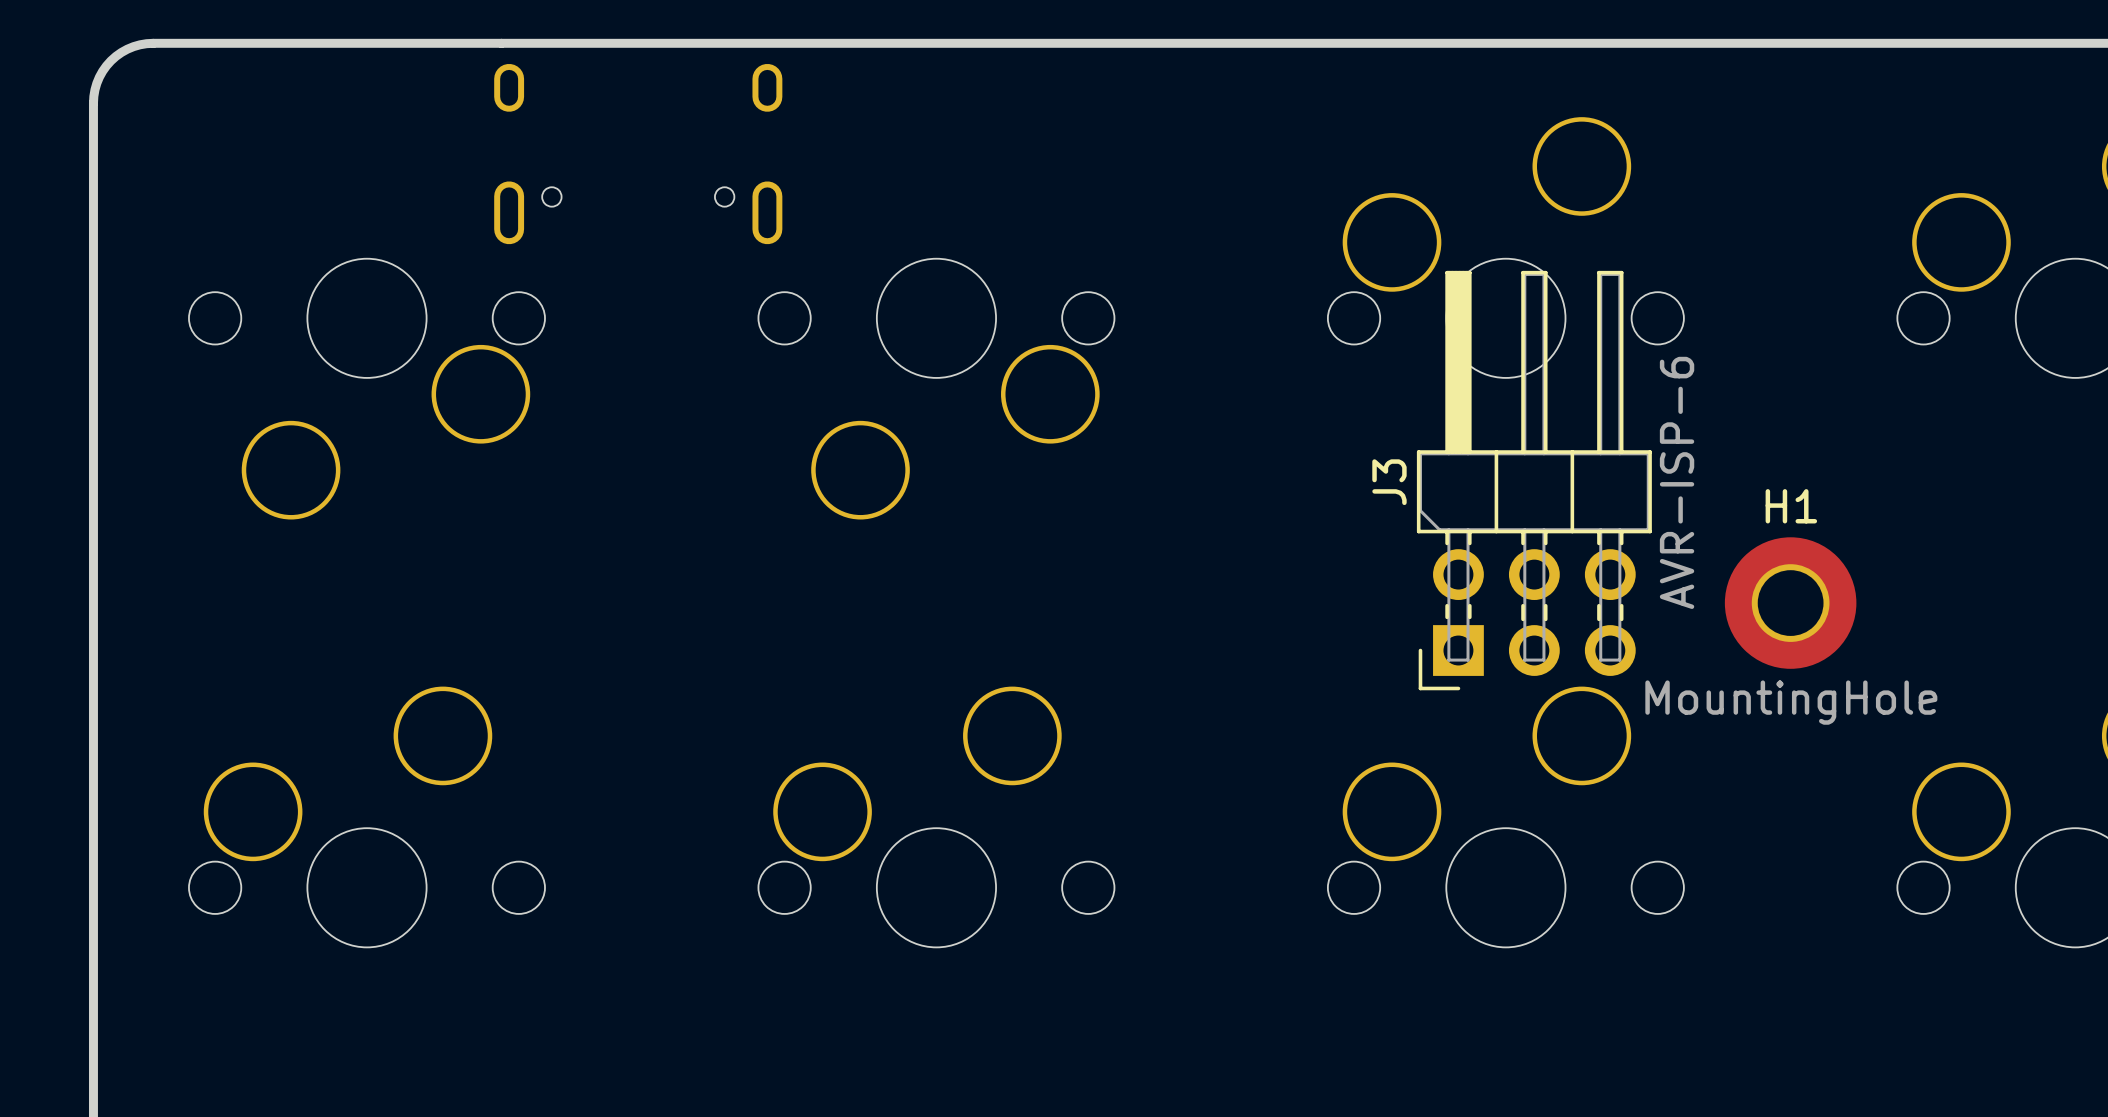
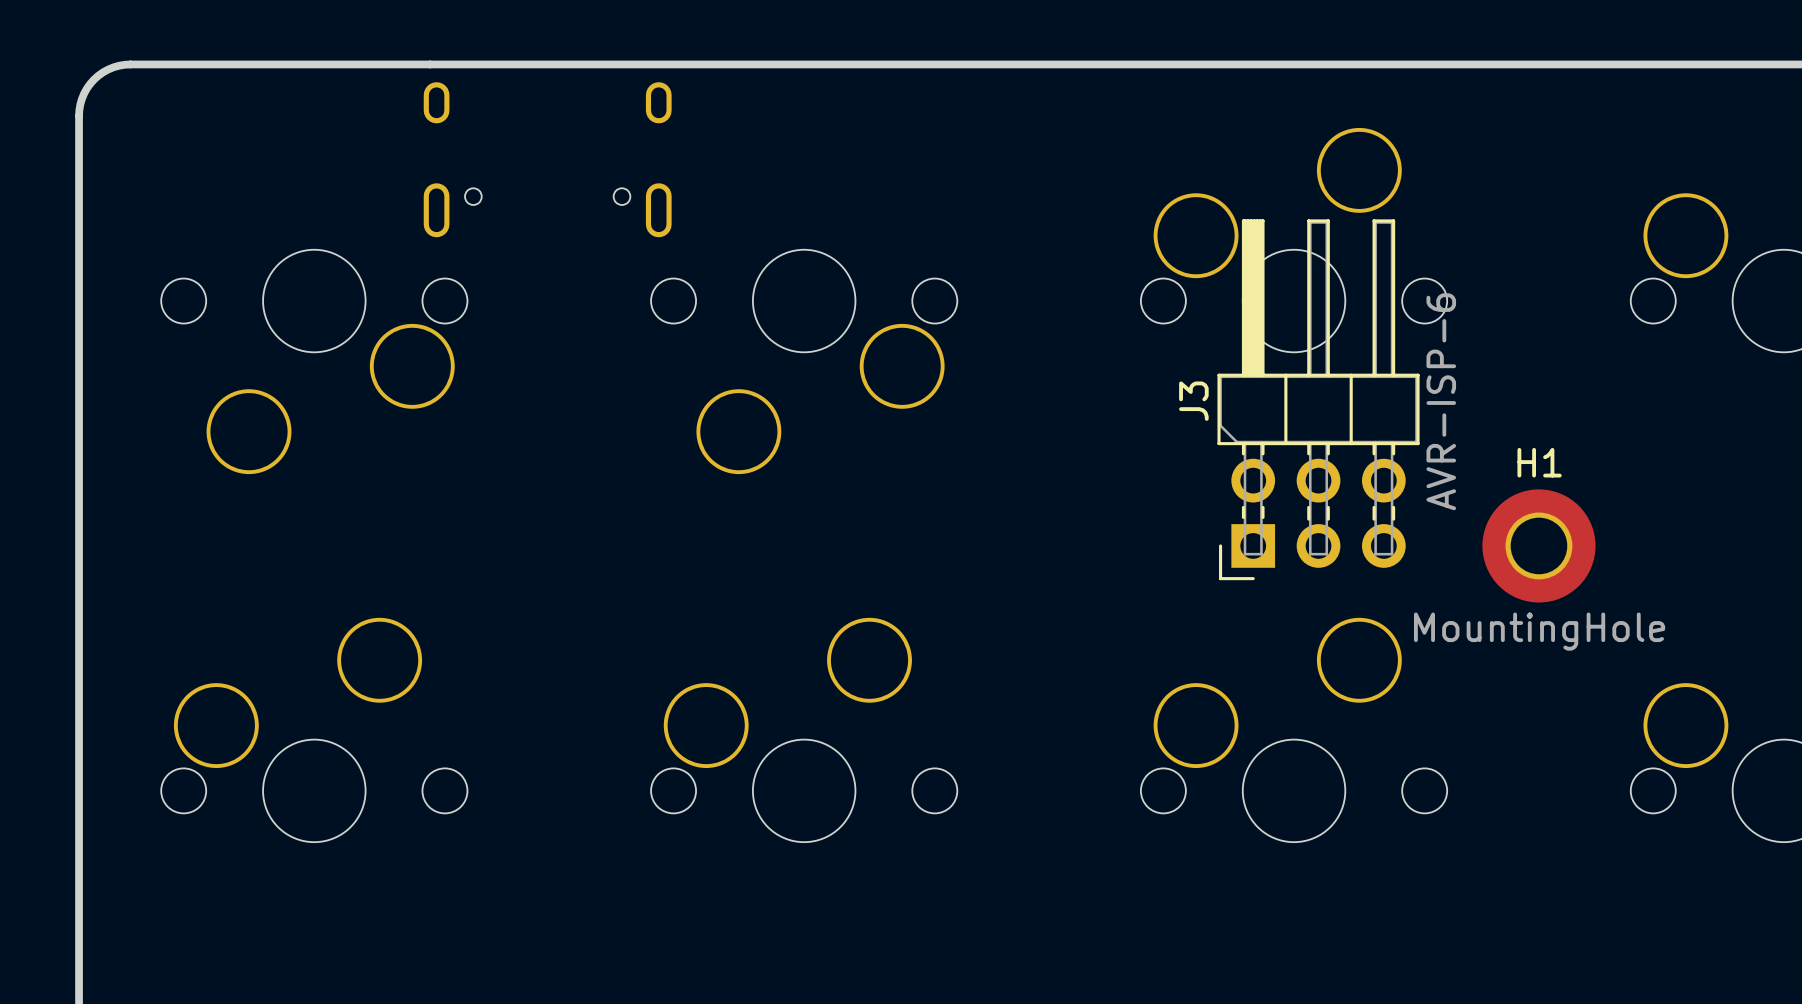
J3 position: (1534, 480) -> (1318, 399)

